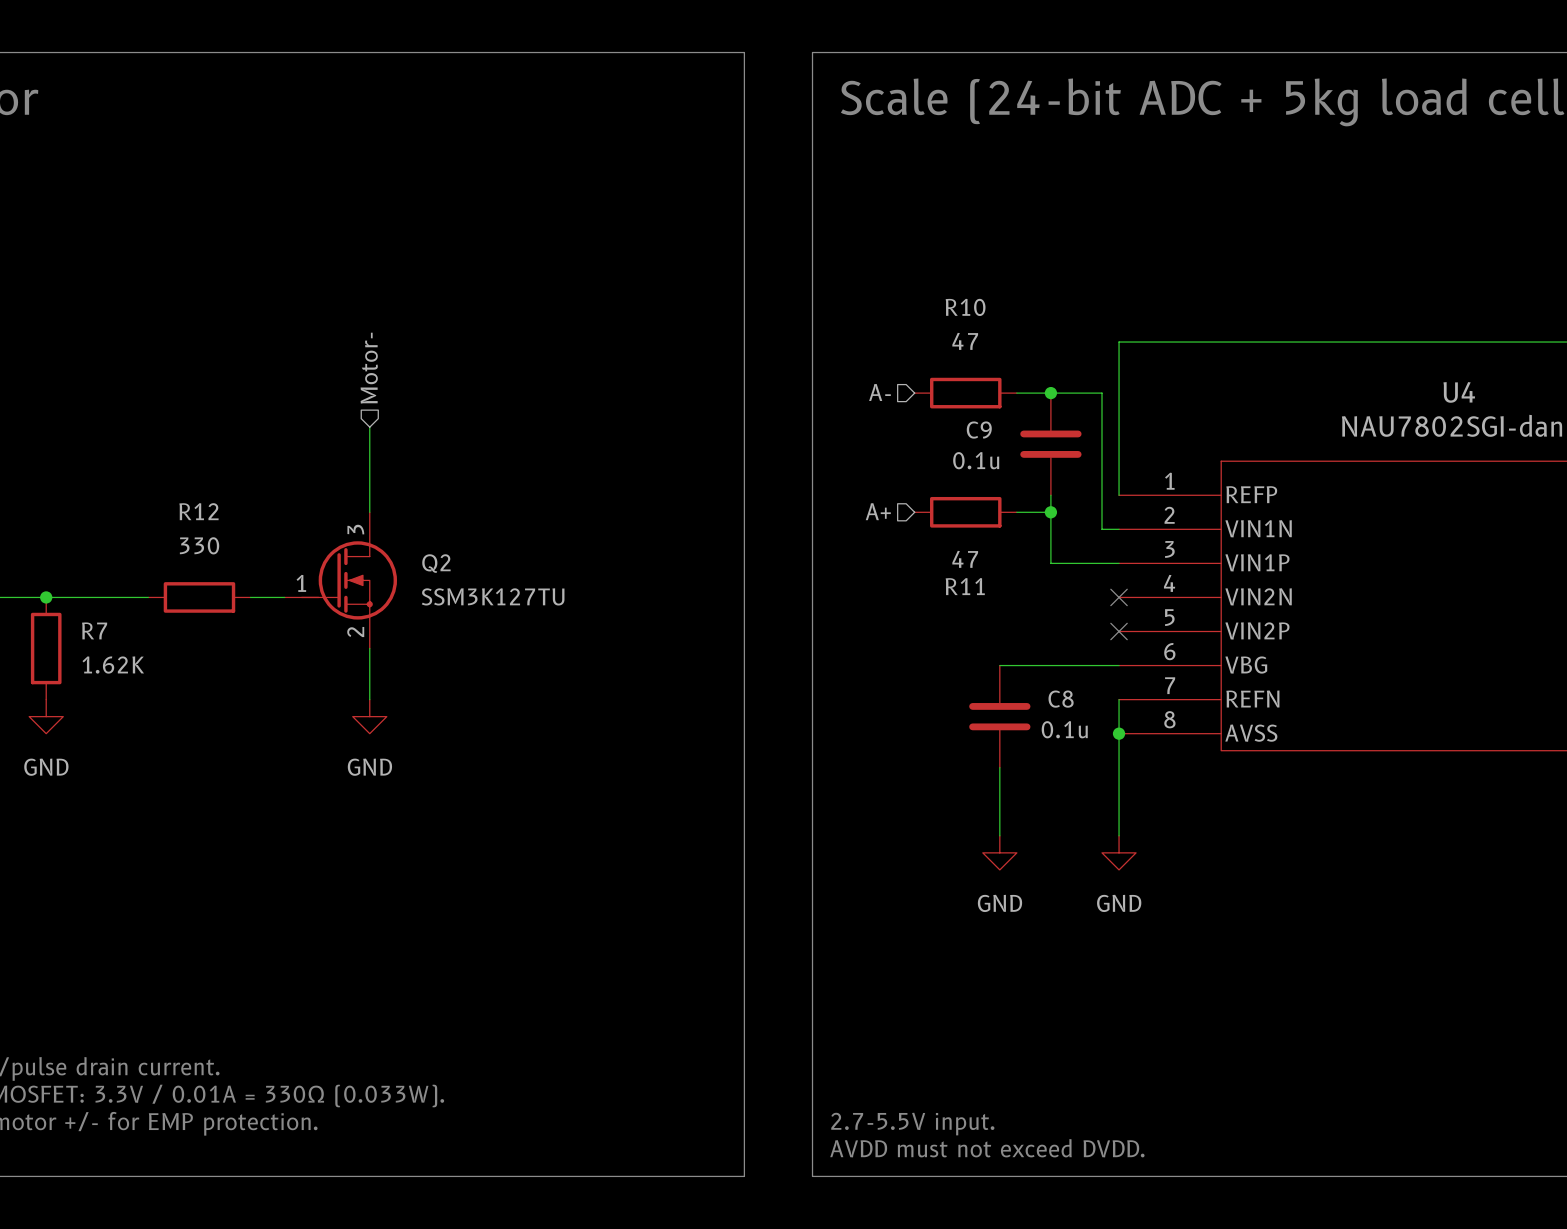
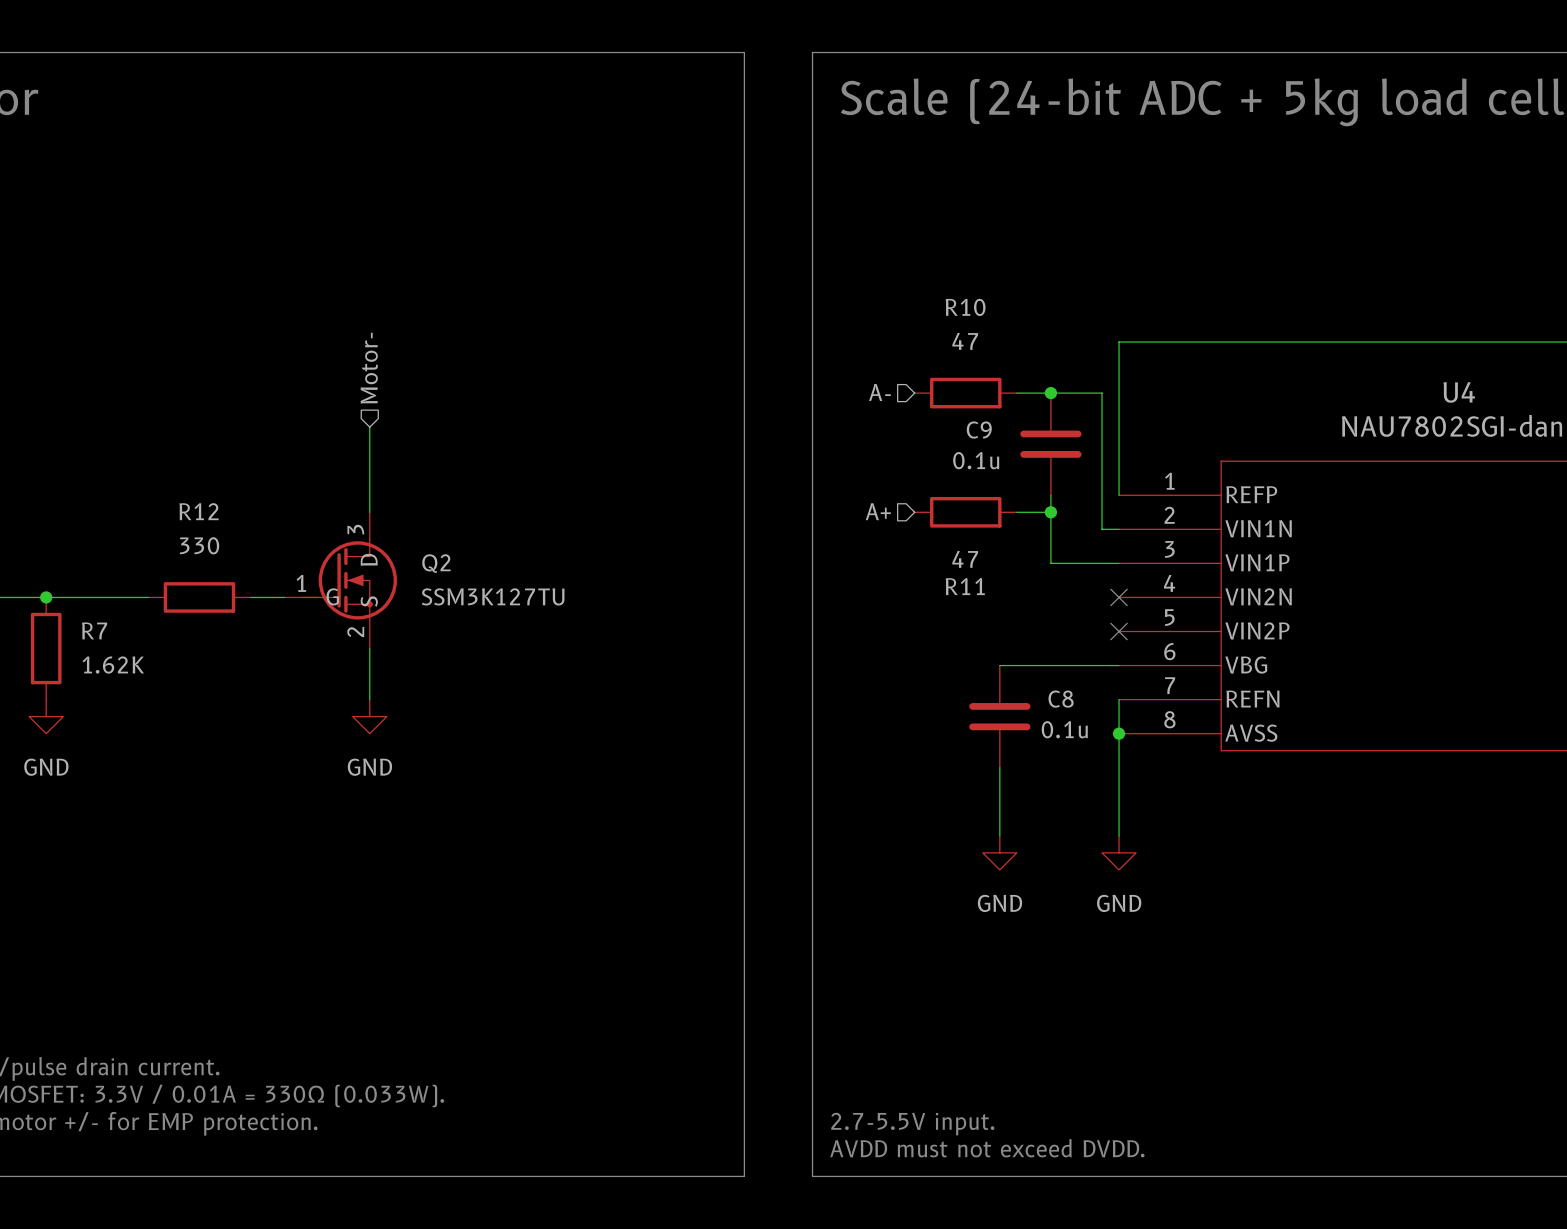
Q2 pin name: none -> D (369, 559)
Q2 pin name: none -> G (332, 596)
Q2 pin name: none -> S (369, 601)

